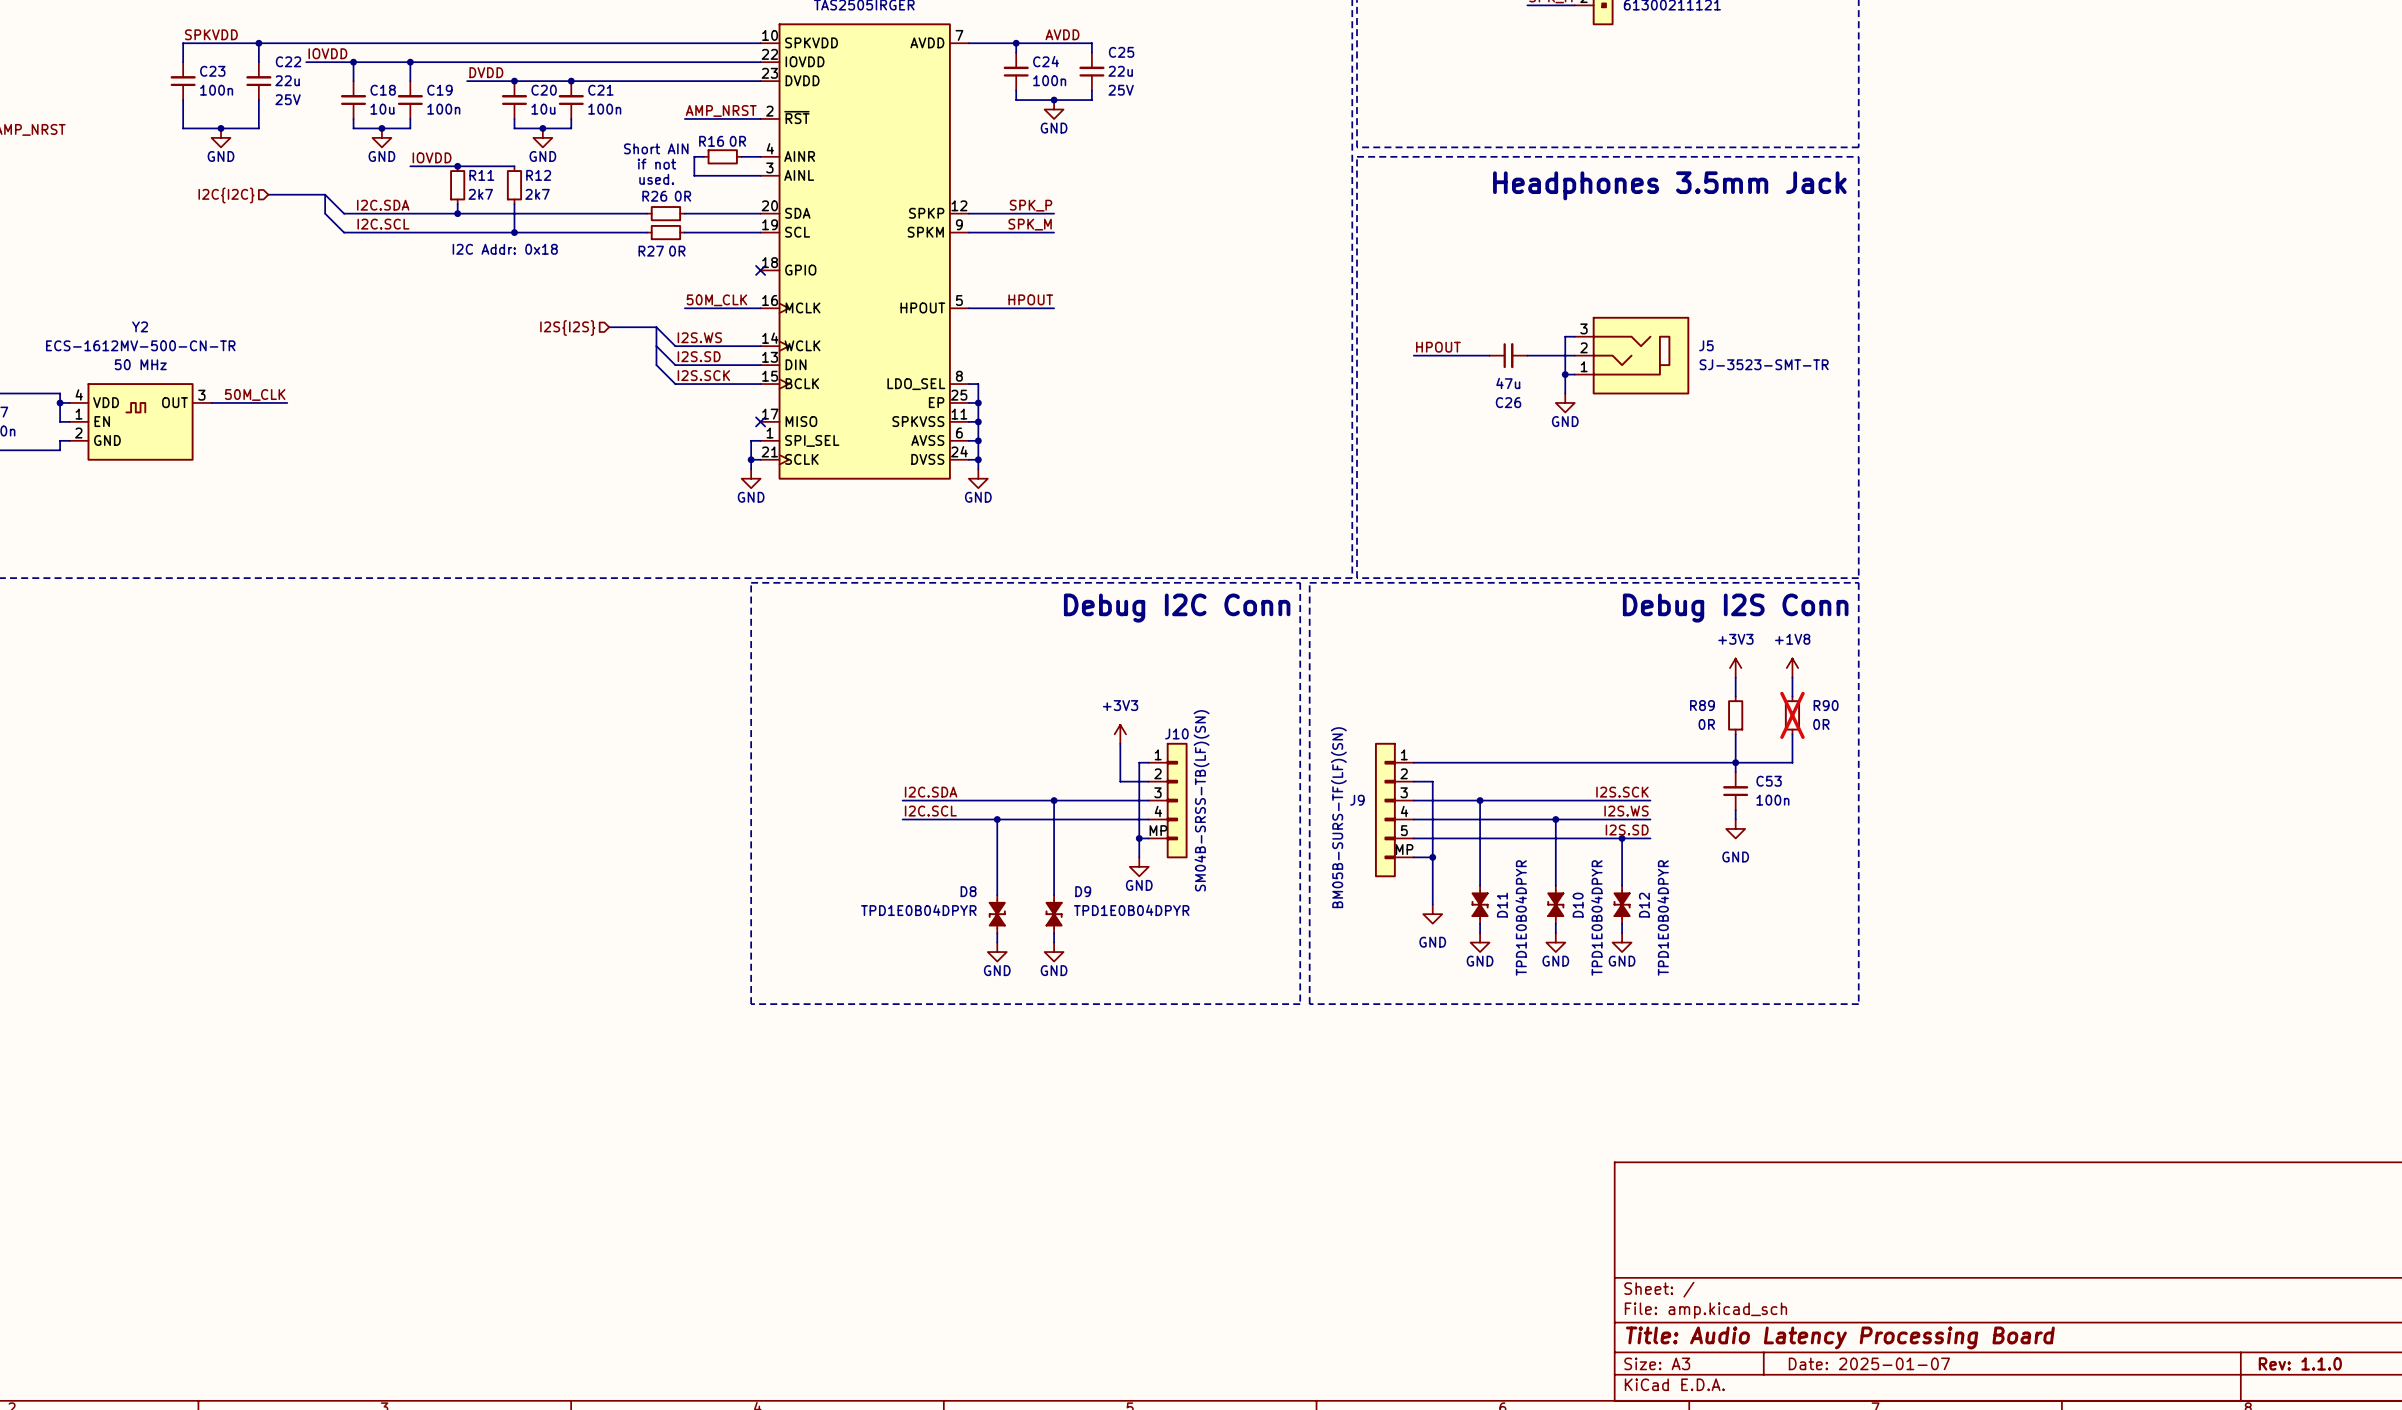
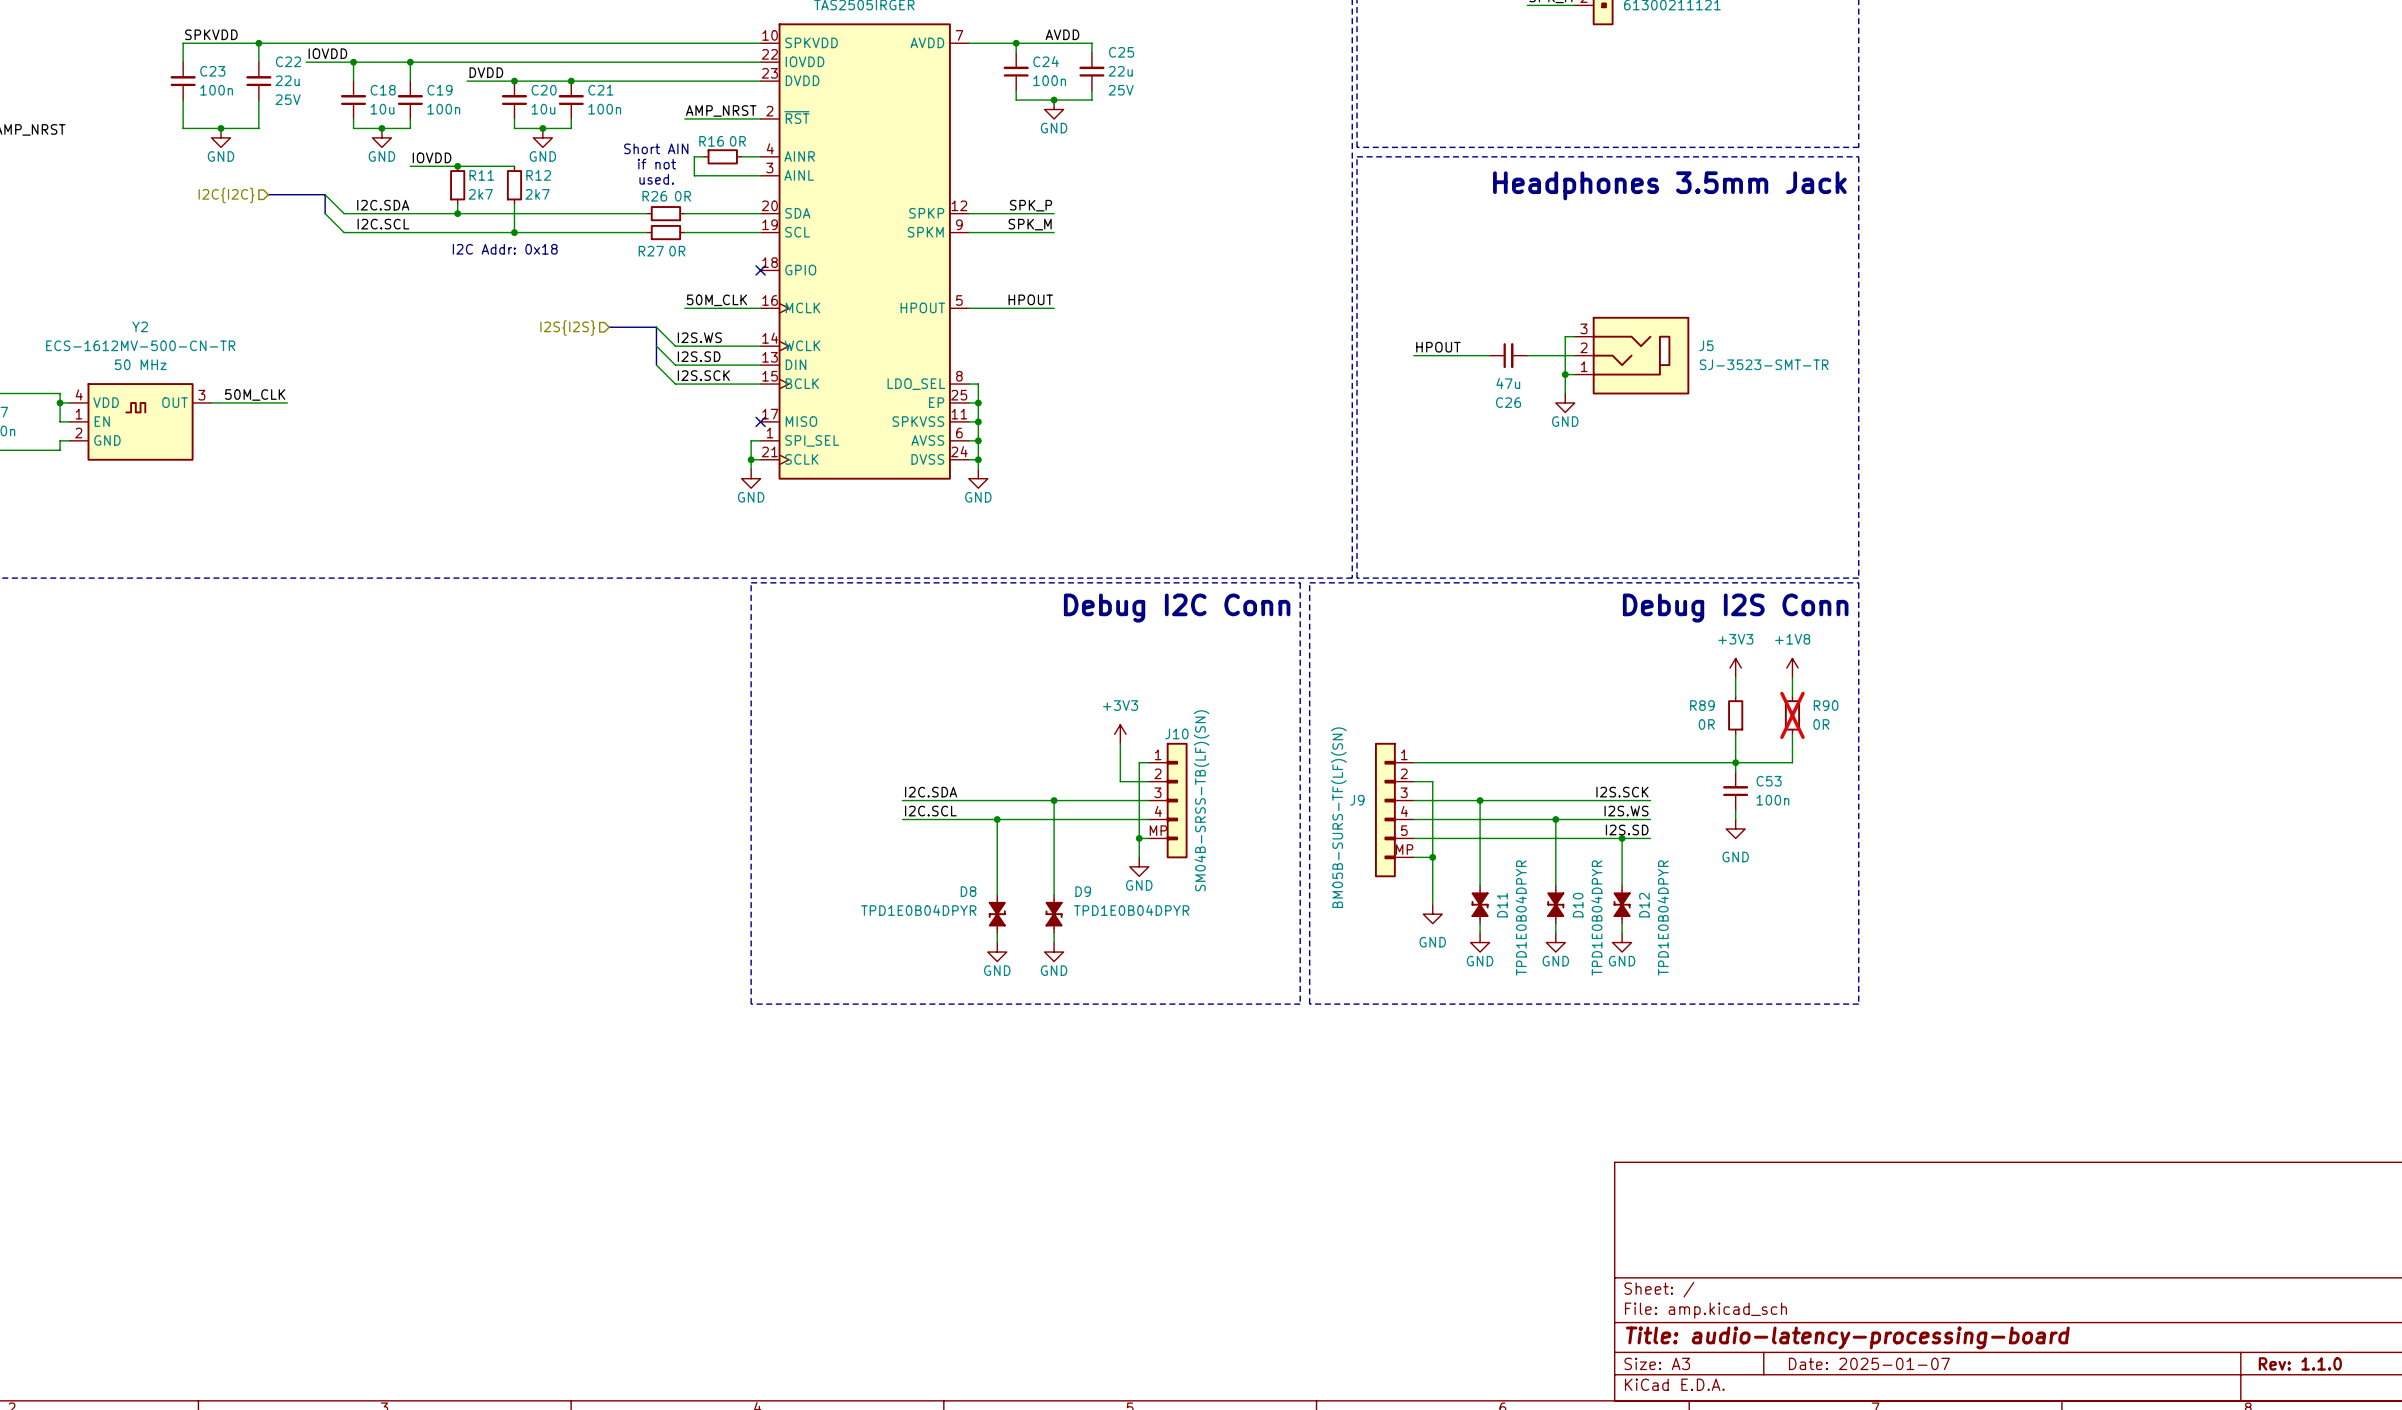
title block: Title: Audio Latency Processing Board (1840, 1337) -> Title: audio-latency-processing-board (1847, 1337)

